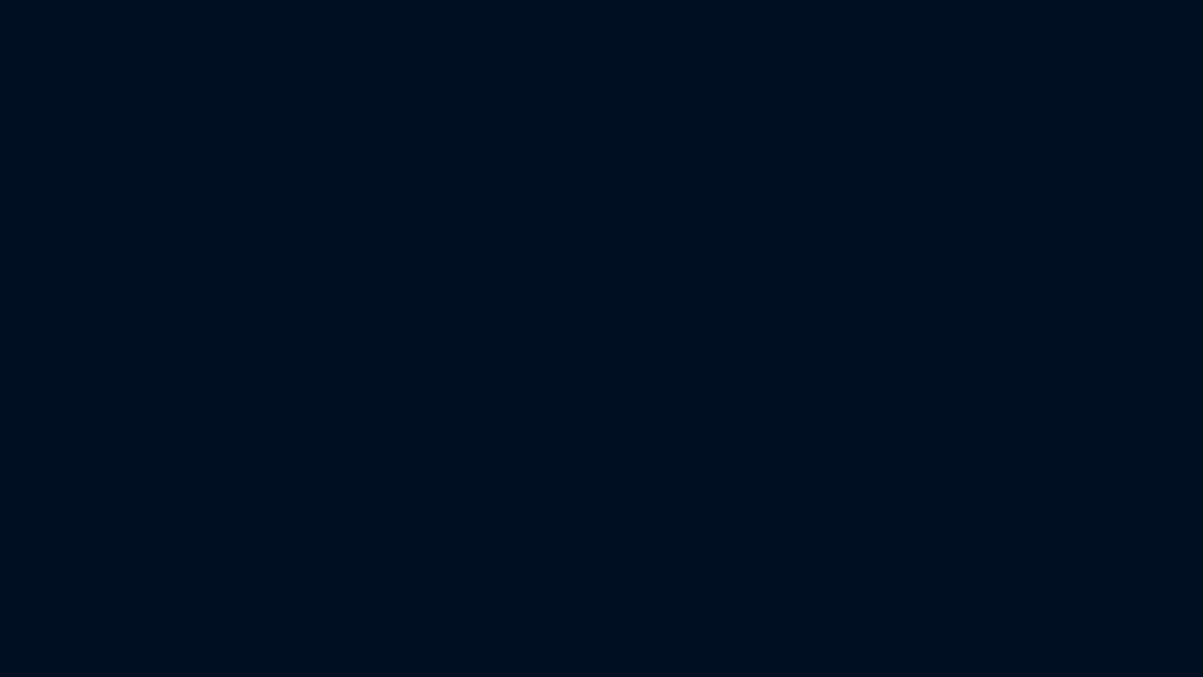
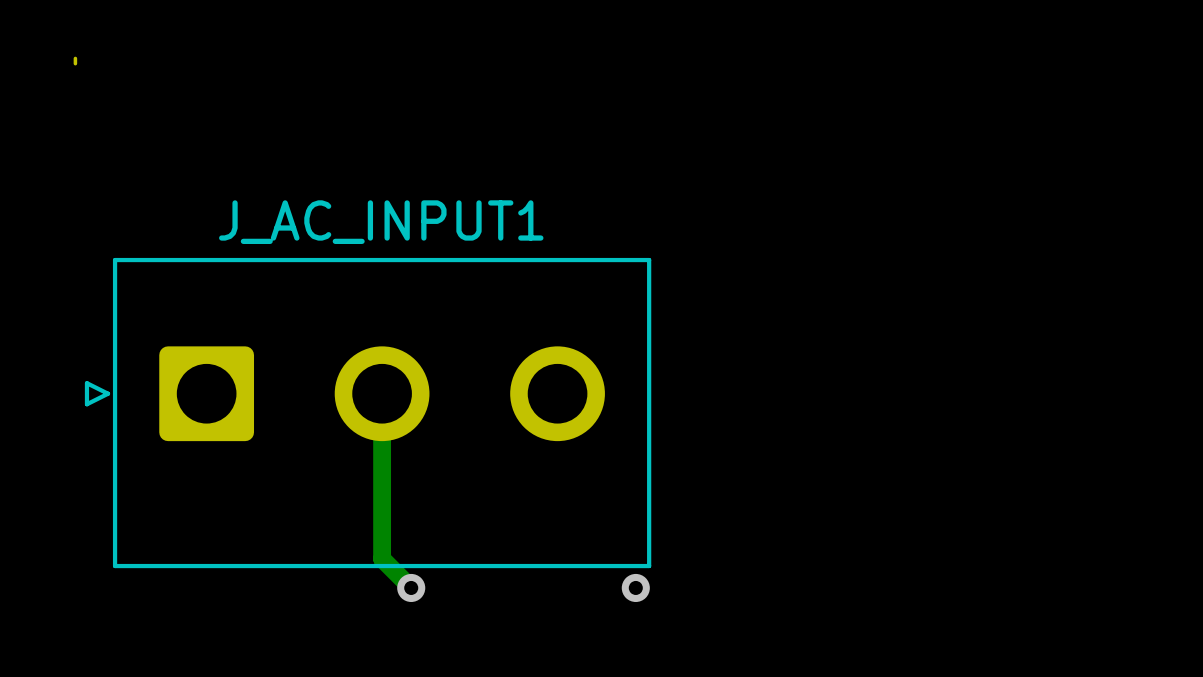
board edge: none -> (75, 58) (75, 63)
track: none -> (382, 393) (382, 558) (411, 587)
J_AC_INPUT1: none -> (368, 413)
via: none -> (411, 587)
via: none -> (635, 587)

